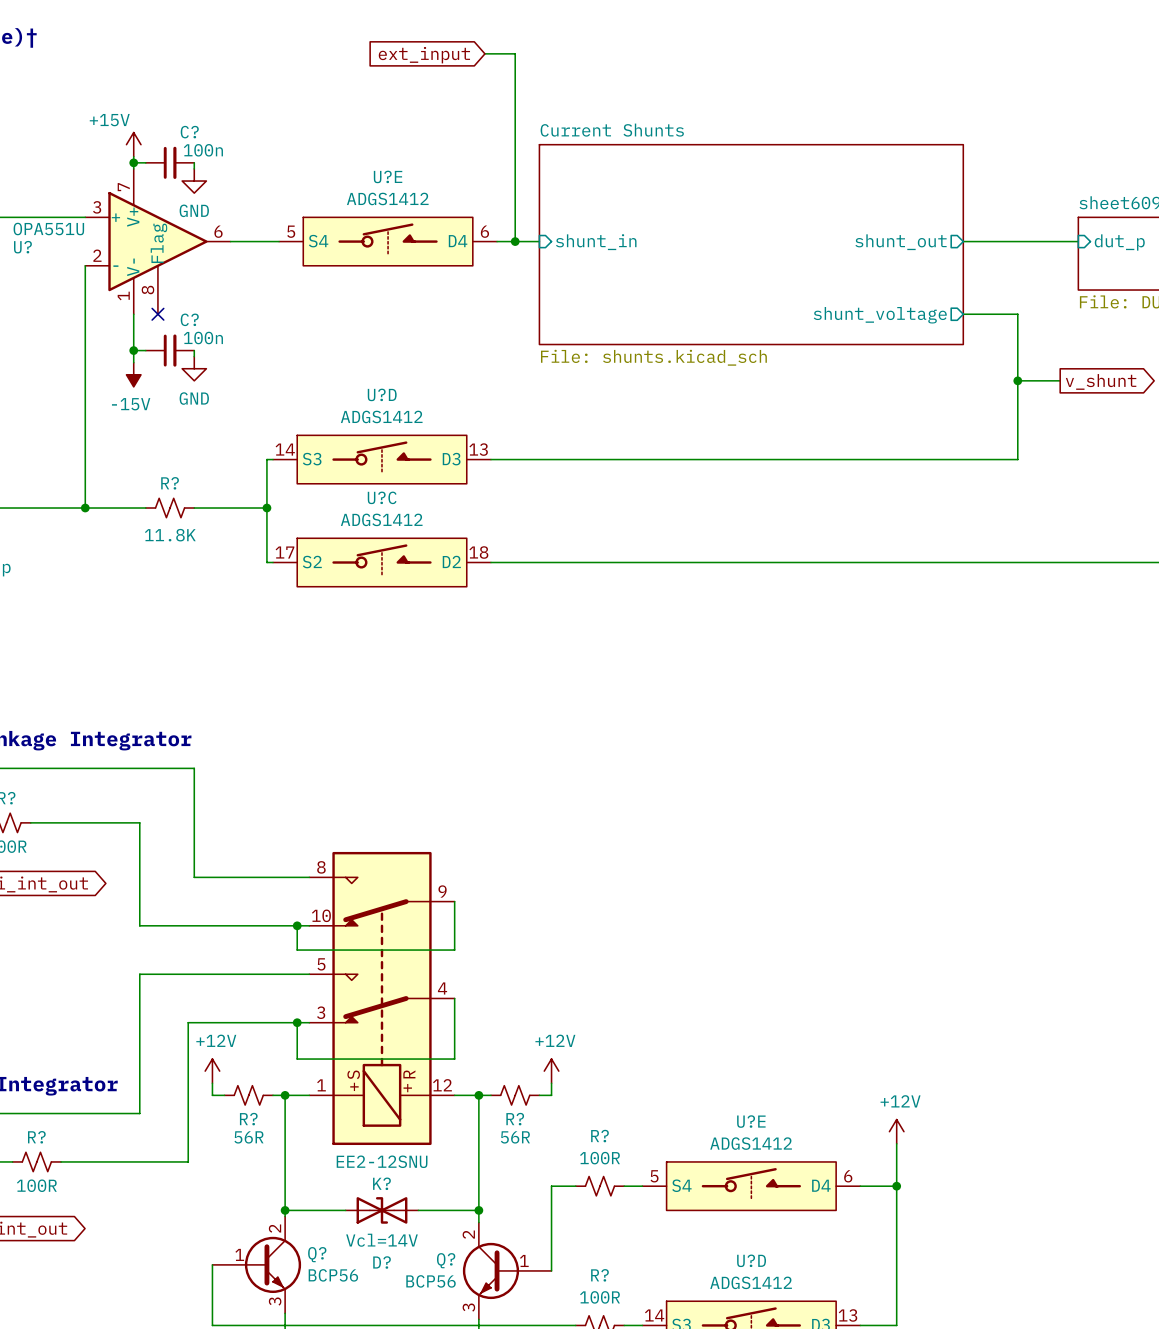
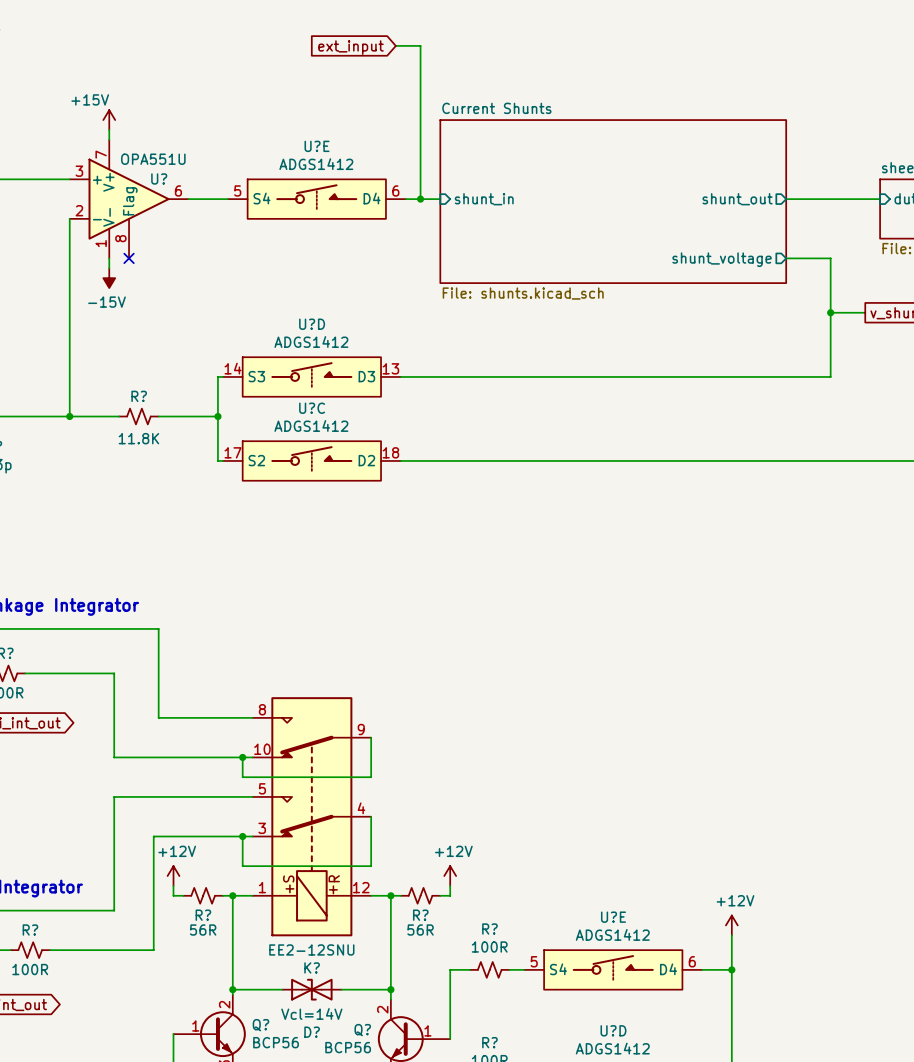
wire: (133, 162) (145, 162) -> none
junction: (133, 162) -> none
C?: 100n (170, 162) -> none
wire: (194, 162) (194, 168) -> none
power symbol: GND (194, 181) -> none
U? value position: OPA551U (48, 229) -> OPA551U (153, 159)
U? name position: U? (22, 247) -> U? (159, 178)
wire: (133, 350) (145, 350) -> none
junction: (133, 350) -> none
C?: 100n (170, 350) -> none
wire: (194, 350) (194, 356) -> none
power symbol: GND (194, 368) -> none
power symbol position: -15V (133, 374) -> -15V (109, 278)

